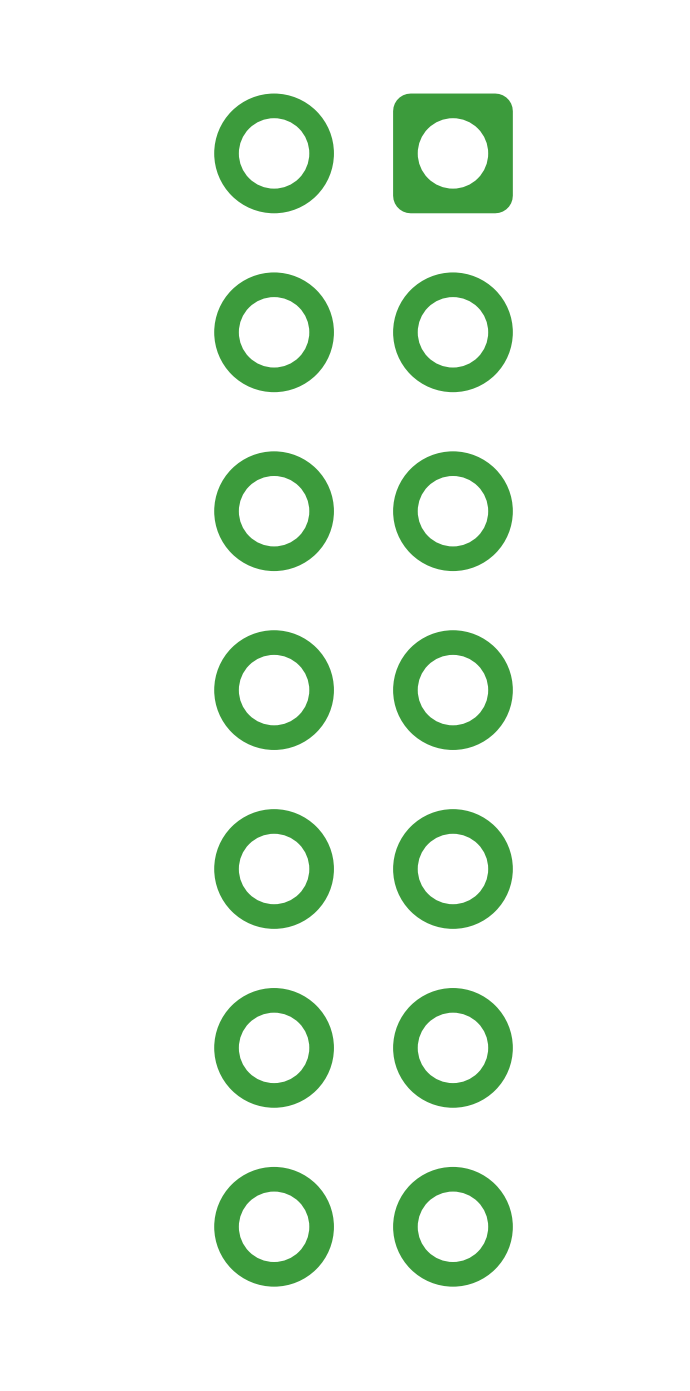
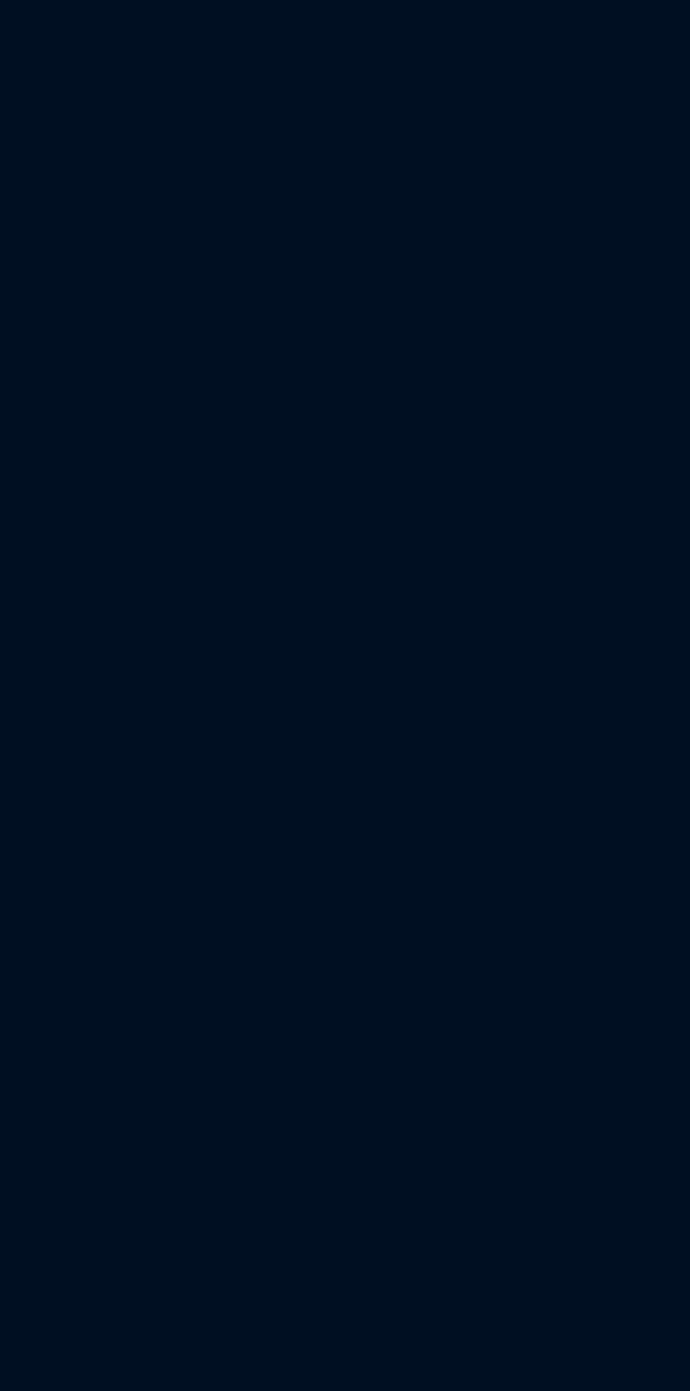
part: (363, 690) -> none

